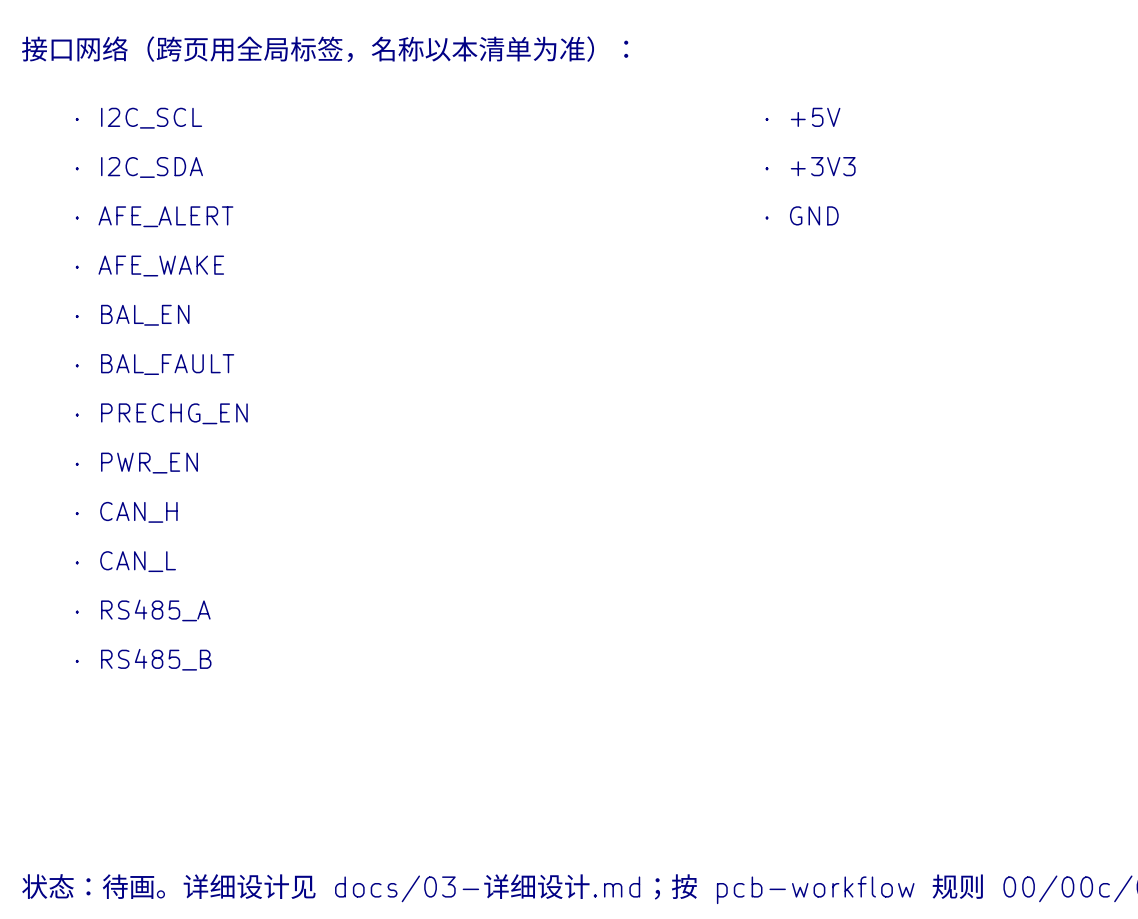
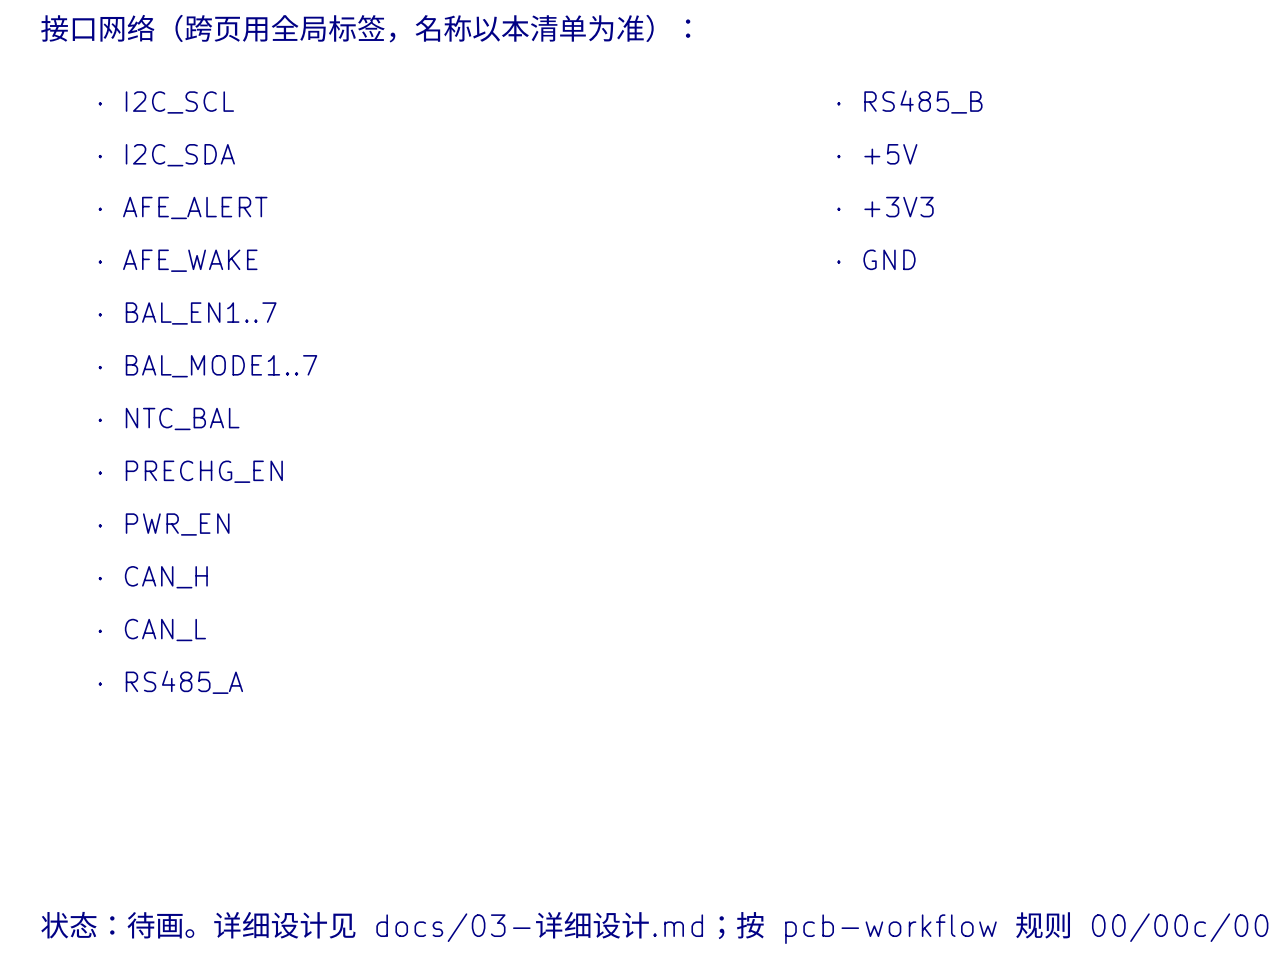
text: · +5V (802, 117) -> · RS485_B (909, 102)
text: · +3V3 (810, 166) -> · +5V (877, 154)
text: · GND (802, 215) -> · +3V3 (885, 207)
text: none -> · GND (876, 259)
text: · BAL_EN (132, 315) -> · BAL_EN1..7 (187, 313)
text: · BAL_FAULT (154, 364) -> · BAL_MODE1..7 (207, 366)
text: · PRECHG_EN (161, 413) -> · NTC_BAL (169, 418)
text: · PWR_EN (136, 463) -> · PRECHG_EN (190, 471)
text: · CAN_H (126, 512) -> · PWR_EN (164, 524)
text: · CAN_L (125, 561) -> · CAN_H (153, 577)
text: · RS485_A (143, 610) -> · CAN_L (152, 630)
text: · RS485_B (143, 659) -> · RS485_A (170, 682)

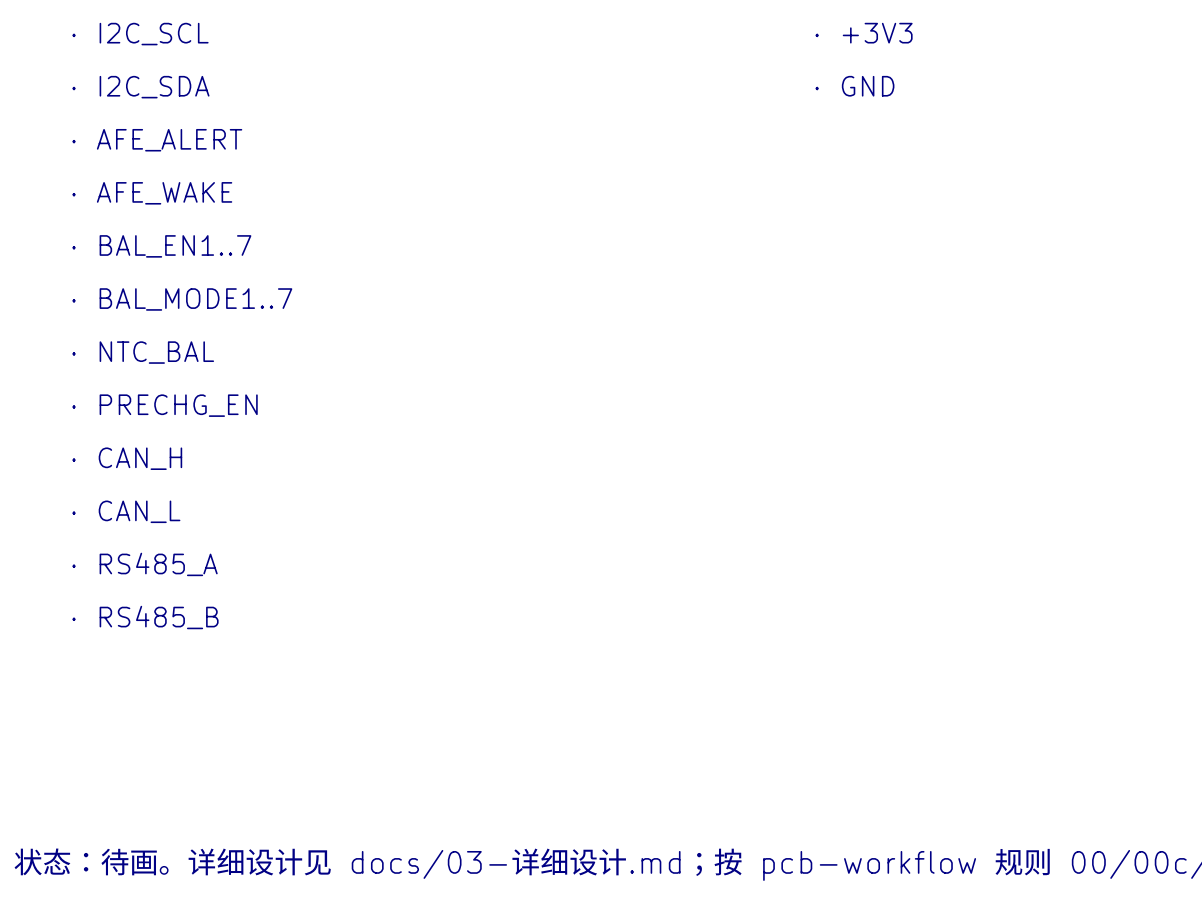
text: · RS485_B (909, 102) -> · +3V3 (864, 33)
text: · +5V (877, 154) -> · GND (854, 86)
text: · +3V3 (885, 207) -> none
text: · GND (876, 259) -> none
text: · PWR_EN (164, 524) -> · CAN_H (127, 458)
text: · CAN_H (153, 577) -> · CAN_L (126, 511)
text: · CAN_L (152, 630) -> · RS485_A (145, 564)
text: · RS485_A (170, 682) -> · RS485_B (145, 617)

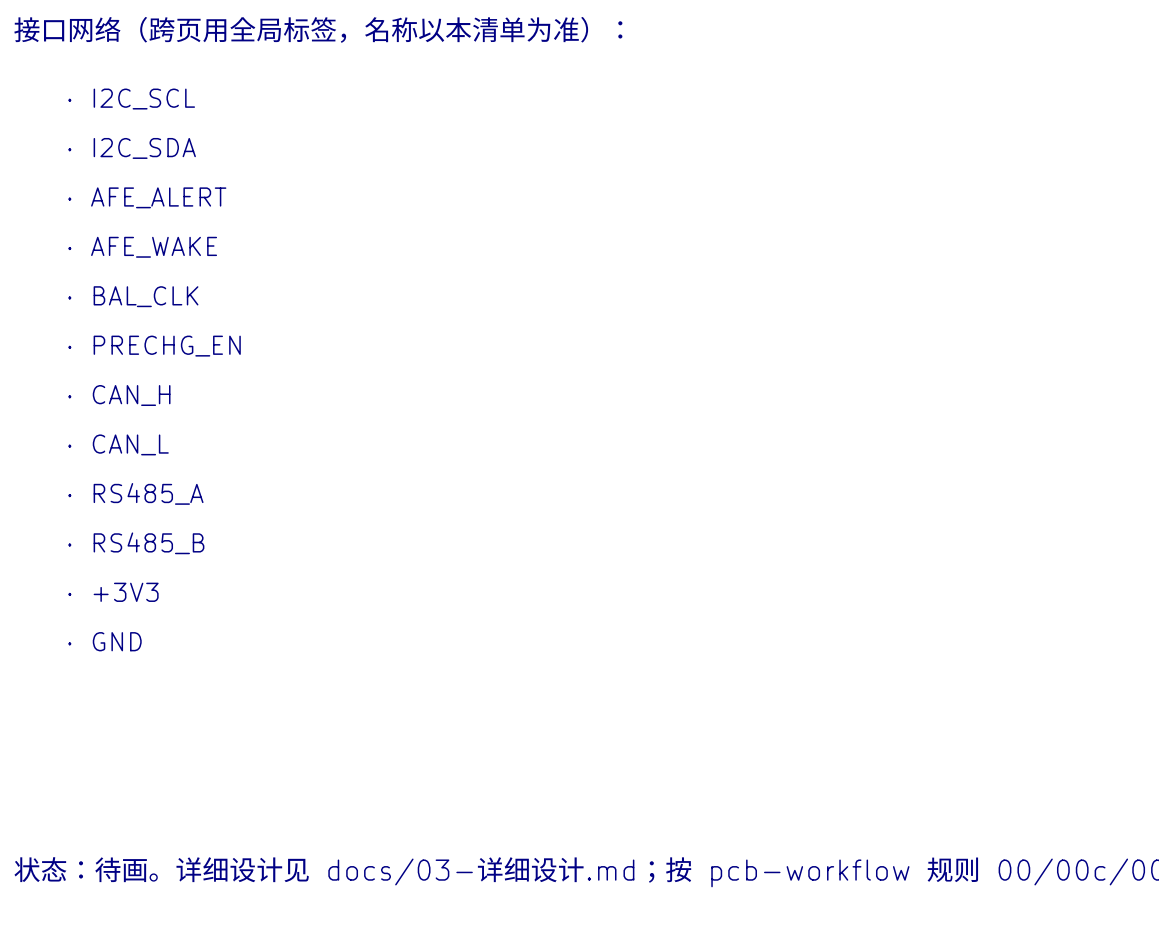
text: · +3V3 (864, 33) -> none
text: · GND (854, 86) -> none
text: · BAL_EN1..7 (161, 246) -> · BAL_CLK (133, 296)
text: · BAL_MODE1..7 (182, 299) -> · PRECHG_EN (154, 346)
text: · NTC_BAL (143, 352) -> · CAN_H (119, 395)
text: · PRECHG_EN (165, 405) -> · CAN_L (118, 444)
text: · CAN_H (127, 458) -> · RS485_A (135, 493)
text: · CAN_L (126, 511) -> · RS485_B (136, 543)
text: · RS485_A (145, 564) -> · +3V3 (113, 592)
text: · RS485_B (145, 617) -> · GND (104, 641)

